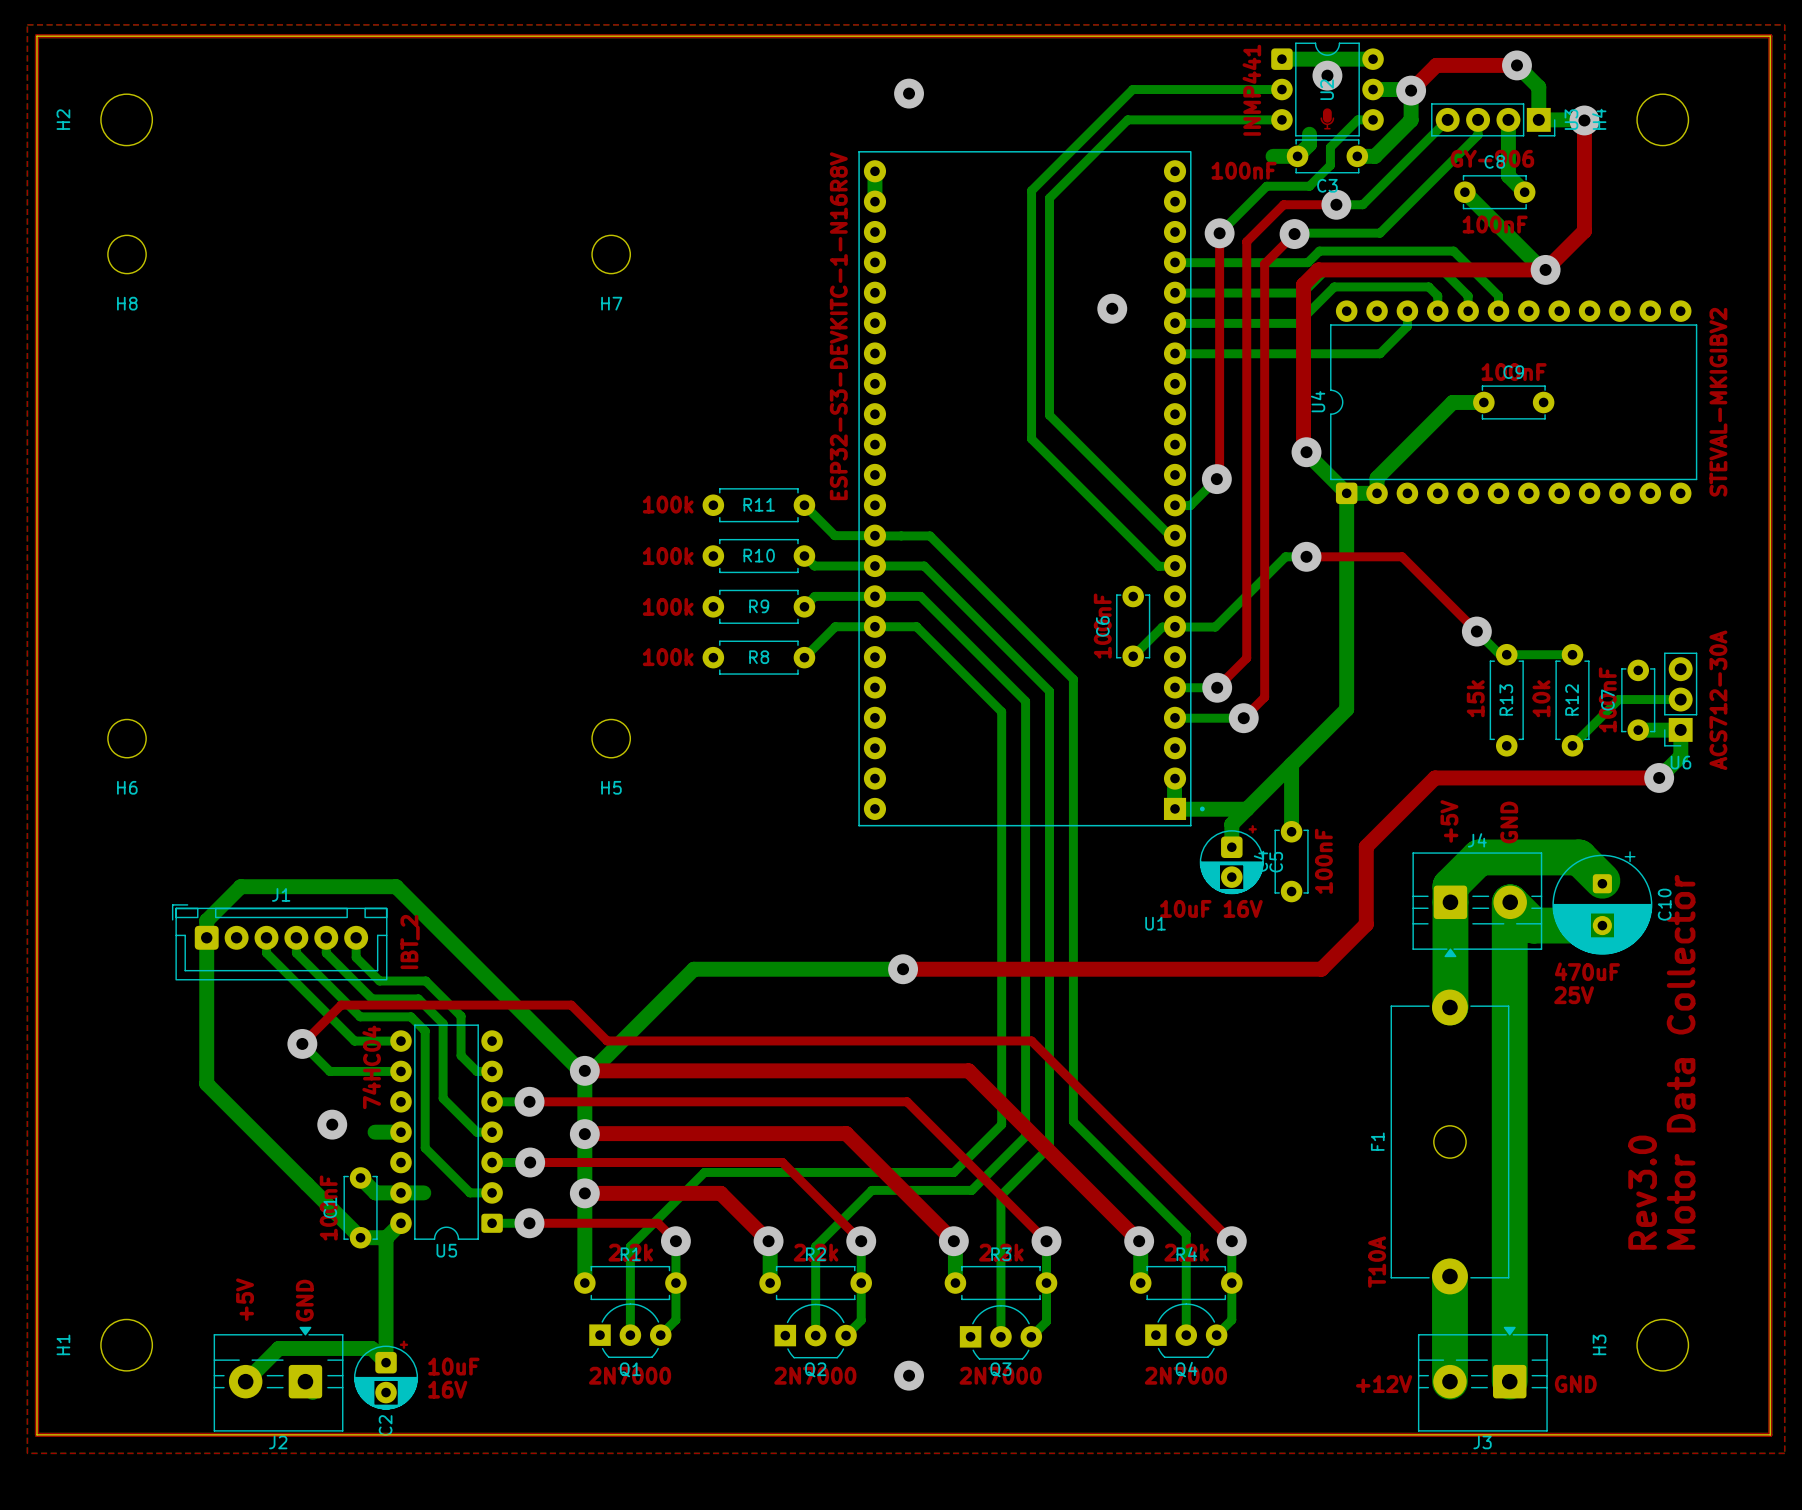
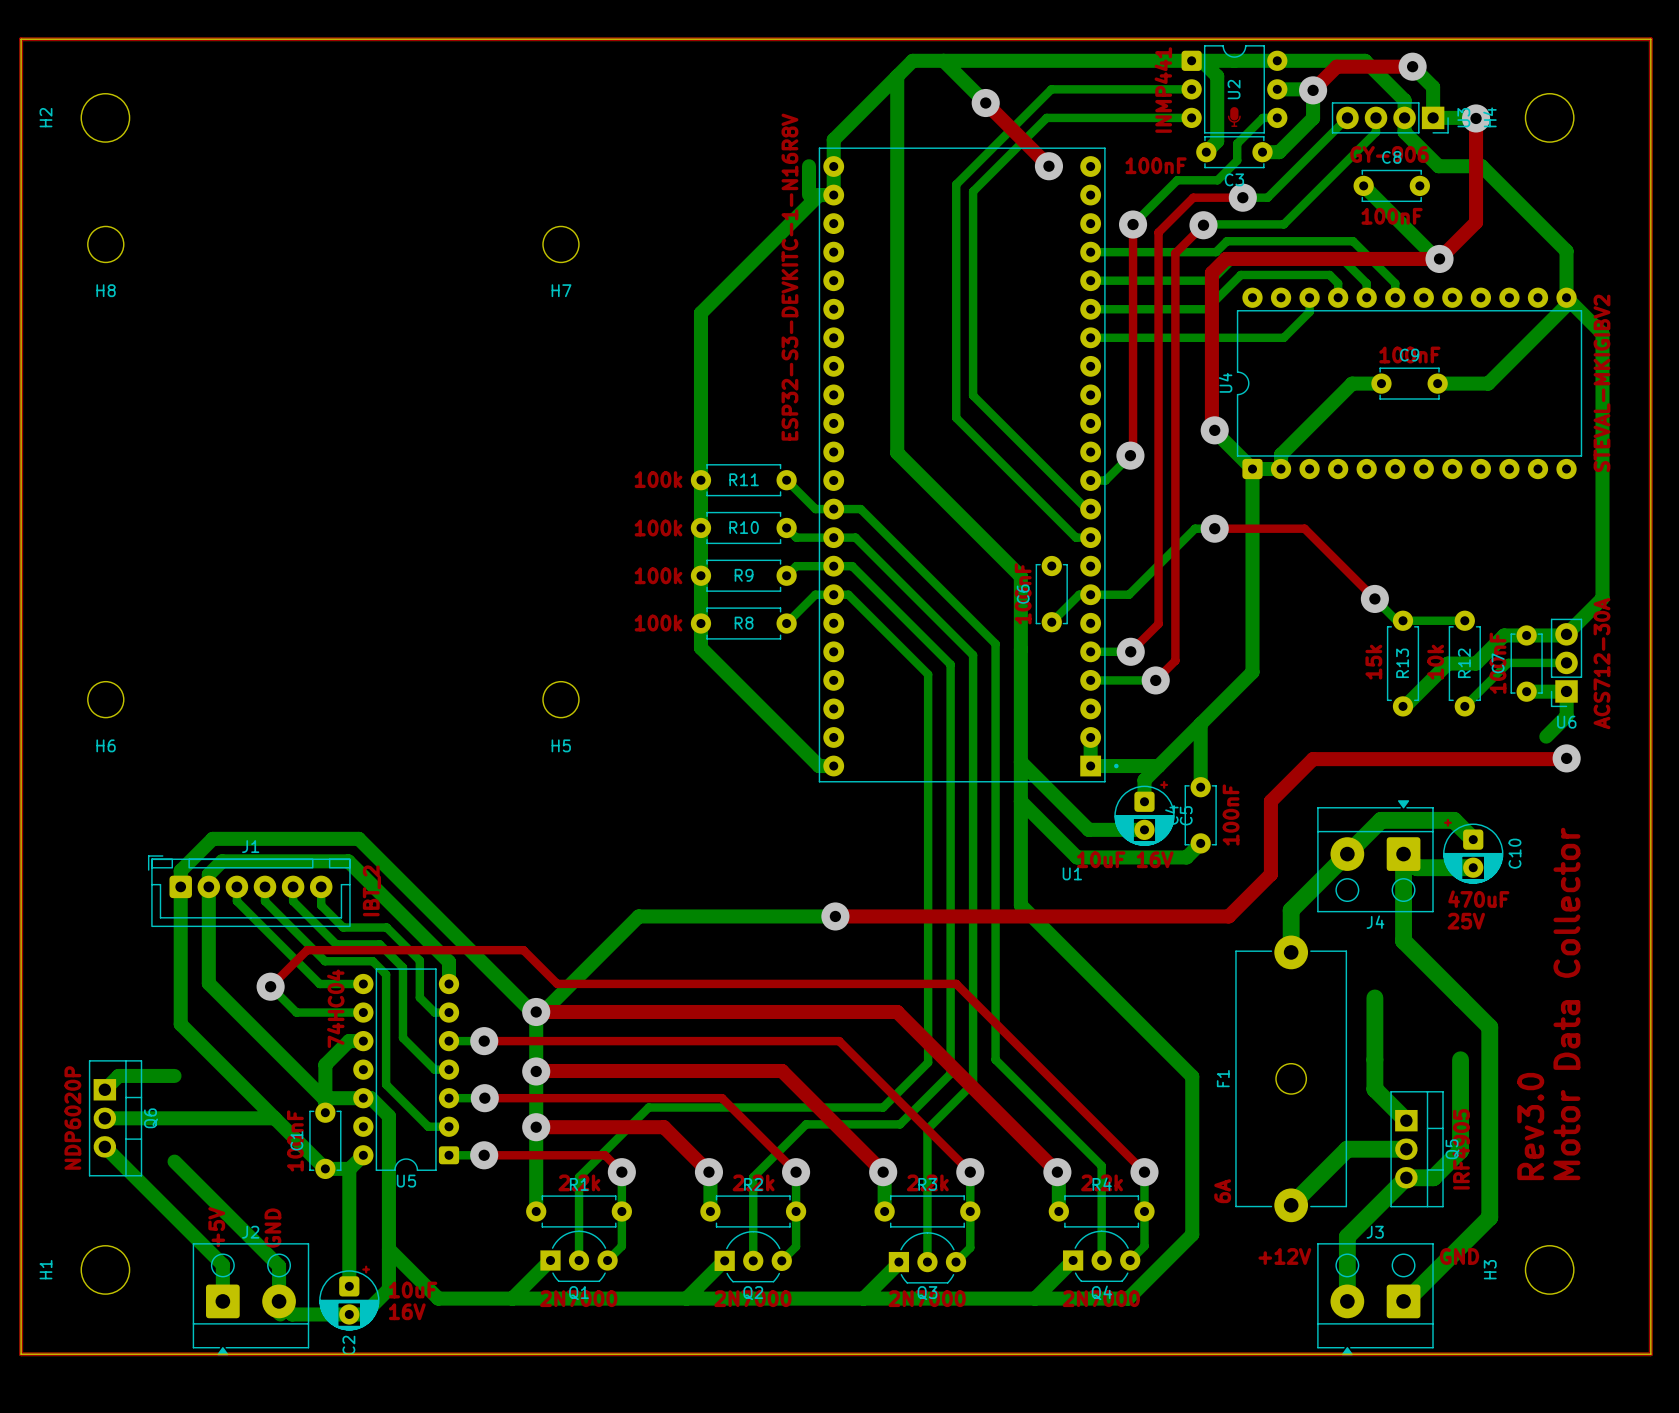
top zone outline: (27, 24) (1784, 24) (1784, 1453) (27, 1453) (27, 24) -> none
bottom track: none -> (943, 60) (985, 103)
bottom track: none -> (1191, 60) (912, 60) (833, 139) (833, 195) (819, 195) (700, 313) (700, 647) (819, 766) (833, 766)
bottom track: none -> (1277, 60) (1365, 60) (1404, 100) (1404, 117)
bottom track: none -> (897, 76) (897, 452) (1020, 576) (1020, 905) (1192, 1076) (1192, 1234) (1128, 1298) (438, 1298) (388, 1249)
via: (1327, 75) -> none
via: (909, 93) -> none
top track: none -> (985, 103) (1048, 166)
via: none -> (985, 103)
bottom track: (1309, 134) (1309, 144) -> (1201, 60) (1217, 76) (1217, 141)
bottom track: (1508, 135) (1508, 175) (1524, 192) -> (1404, 132) (1438, 166) (1481, 166) (1566, 251) (1566, 305) (1488, 383) (1437, 383)
U1 footprint: [858, 151, 1205, 827] -> [818, 147, 1119, 783]
bottom track: (1273, 156) (1297, 156) -> none
via: none -> (1048, 166)
via: (1112, 308) -> none
bottom track: none -> (1566, 297) (1602, 333) (1602, 598) (1565, 635) (1504, 635) (1476, 663) (1447, 663) (1402, 706)
U1 value position: ESP32-S3-DEVKITC-1-N16R8V (838, 326) -> ESP32-S3-DEVKITC-1-N16R8V (789, 277)
R11 position: (758, 505) -> (743, 480)
bottom track: (804, 505) (834, 535) (874, 535) -> none
bottom track: none -> (786, 480) (815, 509)
R10 position: (758, 556) -> (743, 527)
bottom track: (804, 556) (814, 566) (924, 566) -> (786, 527) (796, 537) (855, 537)
bottom track: (920, 596) (814, 596) (804, 606) -> (852, 566) (796, 566) (786, 575)
R9 position: (758, 606) -> (743, 575)
bottom track: (916, 627) (835, 626) (804, 657) -> (848, 594) (815, 594) (786, 623)
R8 position: (758, 657) -> (743, 623)
top track: (1659, 777) (1435, 777) (1411, 801) -> (1566, 758) (1313, 759)
via position: (1659, 777) -> (1566, 758)
bottom track: none -> (1020, 761) (1088, 829) (1144, 829)
text: +5V (1449, 821) -> none
text: GND (1509, 822) -> none
J4 name position: J4 (1477, 840) -> J4 (1375, 922)
bottom track: none -> (1020, 801) (1077, 857) (1186, 857) (1200, 843)
C10 footprint: [1552, 851, 1653, 955] -> [1443, 818, 1504, 884]
J4 footprint: [1412, 852, 1543, 958] -> [1317, 800, 1434, 913]
bottom track: (1602, 880) (1579, 857) (1479, 857) (1450, 886) (1449, 1007) -> none
bottom track: none -> (1473, 839) (1453, 820) (1381, 820) (1291, 910) (1291, 952)
bottom track: none -> (1473, 867) (1417, 867) (1403, 854) (1403, 940) (1489, 1027) (1489, 1217) (1403, 1303)
bottom track: (1602, 925) (1533, 925) (1509, 902) (1509, 1381) -> none
text position: 470uF (1587, 971) -> 470uF (1478, 899)
text position: 25V (1574, 995) -> 25V (1466, 921)
bottom track: none -> (449, 984) (449, 961) (348, 861) (222, 861) (208, 874) (208, 983) (325, 1099)
bottom track: none -> (1374, 997) (1374, 1089) (1406, 1120)
bottom track: none -> (1460, 1059) (1460, 1150) (1433, 1177) (1406, 1177) (1347, 1236) (1347, 1301)
via: (332, 1124) -> none
bottom track: (375, 1132) (400, 1132) -> none
bottom track: none -> (174, 1075) (118, 1075) (104, 1089)
F1 position: (1449, 1141) -> (1291, 1078)
bottom track: none -> (323, 1098) (370, 1098) (388, 1116) (388, 1289) (363, 1314) (292, 1314) (279, 1301) (279, 1266) (174, 1161)
bottom track: (360, 1177) (375, 1192) (423, 1192) -> (325, 1112) (325, 1064) (349, 1041) (363, 1041)
bottom track: none -> (104, 1118) (274, 1118)
Q6: none -> NDP6020P (115, 1118)
bottom track: none -> (104, 1146) (222, 1264) (222, 1301)
bottom track: none -> (1406, 1149) (1347, 1149) (1291, 1205)
Q5: none -> IRF4905 (1417, 1149)
F1 value: T10A (1377, 1262) -> 6A (1222, 1191)
bottom track: (1449, 1276) (1449, 1381) -> none
J2 footprint: [213, 1326, 344, 1432] -> [192, 1243, 310, 1356]
J3 footprint: [1417, 1326, 1548, 1432] -> [1317, 1243, 1434, 1356]
bottom track: none -> (550, 1260) (512, 1298)
bottom track: none -> (724, 1260) (686, 1298)
bottom track: none -> (1073, 1260) (1035, 1298)
bottom track: none -> (898, 1262) (863, 1298)
bottom track: (386, 1362) (371, 1348) (278, 1348) (245, 1381) -> none
via: (909, 1375) -> none
text position: +12V (1384, 1384) -> +12V (1284, 1256)
text position: GND (1575, 1384) -> GND (1459, 1256)
J2 name position: J2 (278, 1442) -> J2 (250, 1232)
J3 name position: J3 (1482, 1442) -> J3 (1375, 1232)

